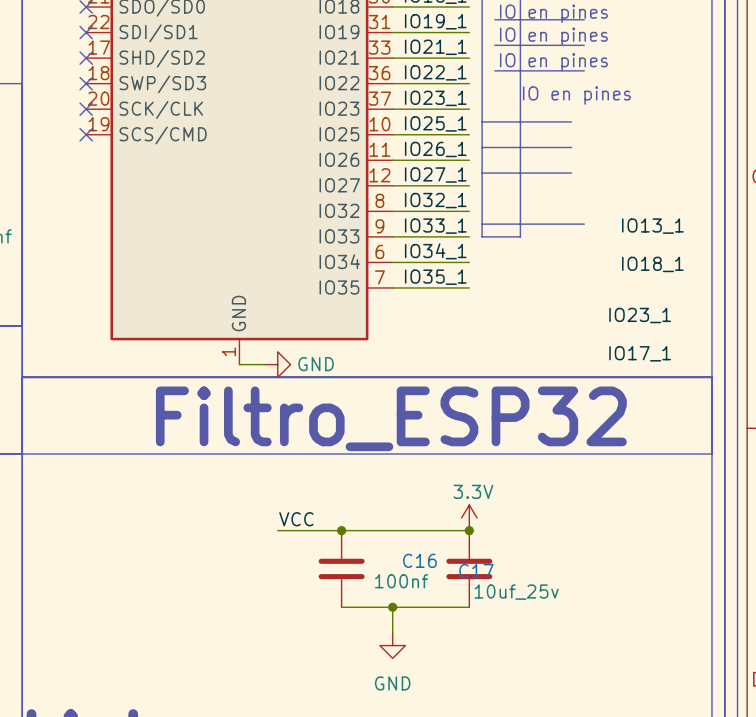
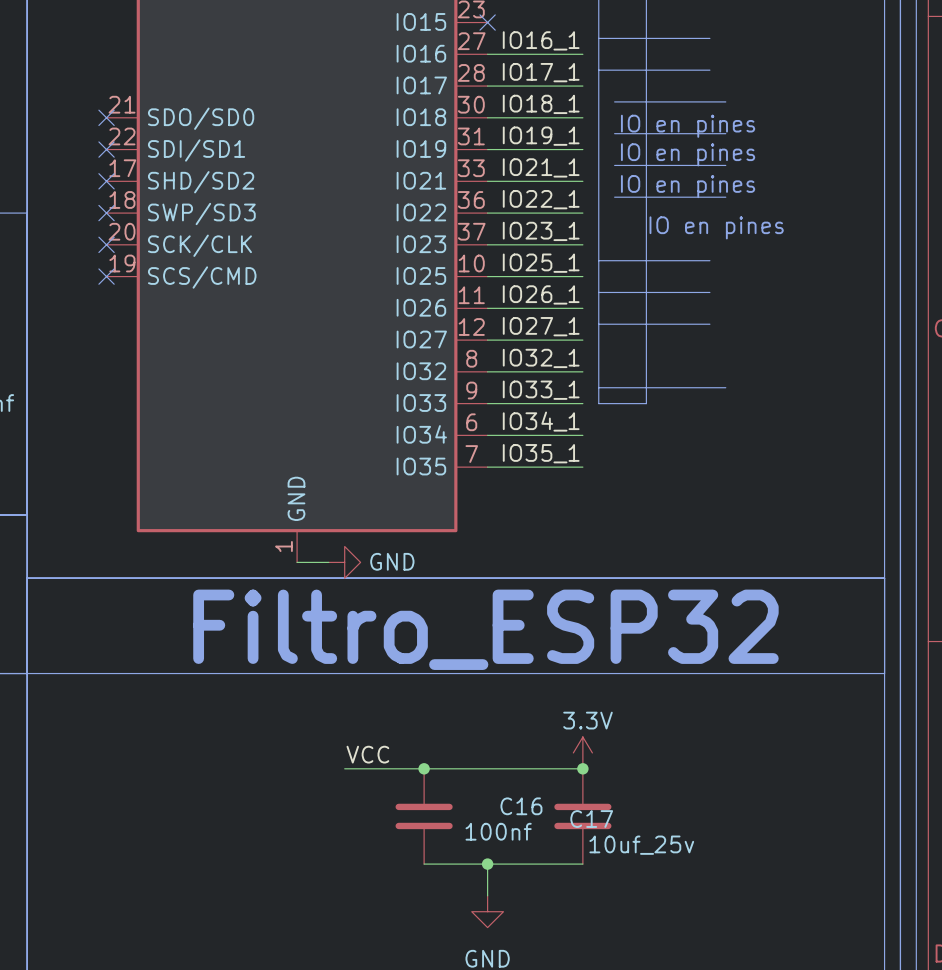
label: IO13_1 (652, 226) -> none
label: IO18_1 (652, 264) -> none
label: IO23_1 (640, 315) -> none
label: IO17_1 (640, 353) -> none

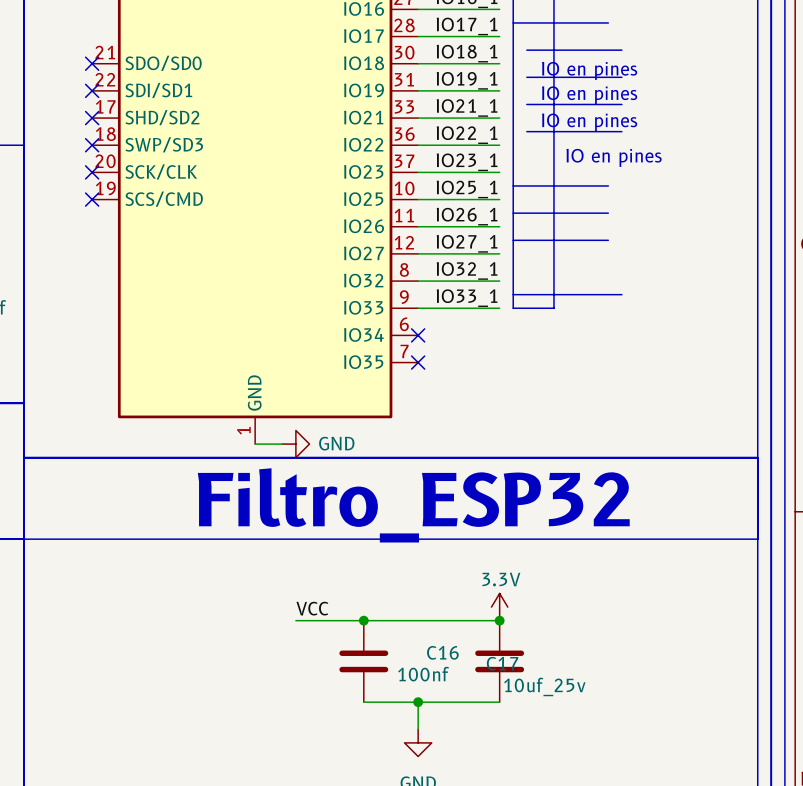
label: IO34_1 (541, 421) -> none
wire: (487, 435) (582, 435) -> none
no-connect mark: none -> (418, 335)
label: IO35_1 (541, 453) -> none
wire: (487, 467) (582, 467) -> none
no-connect mark: none -> (418, 362)

